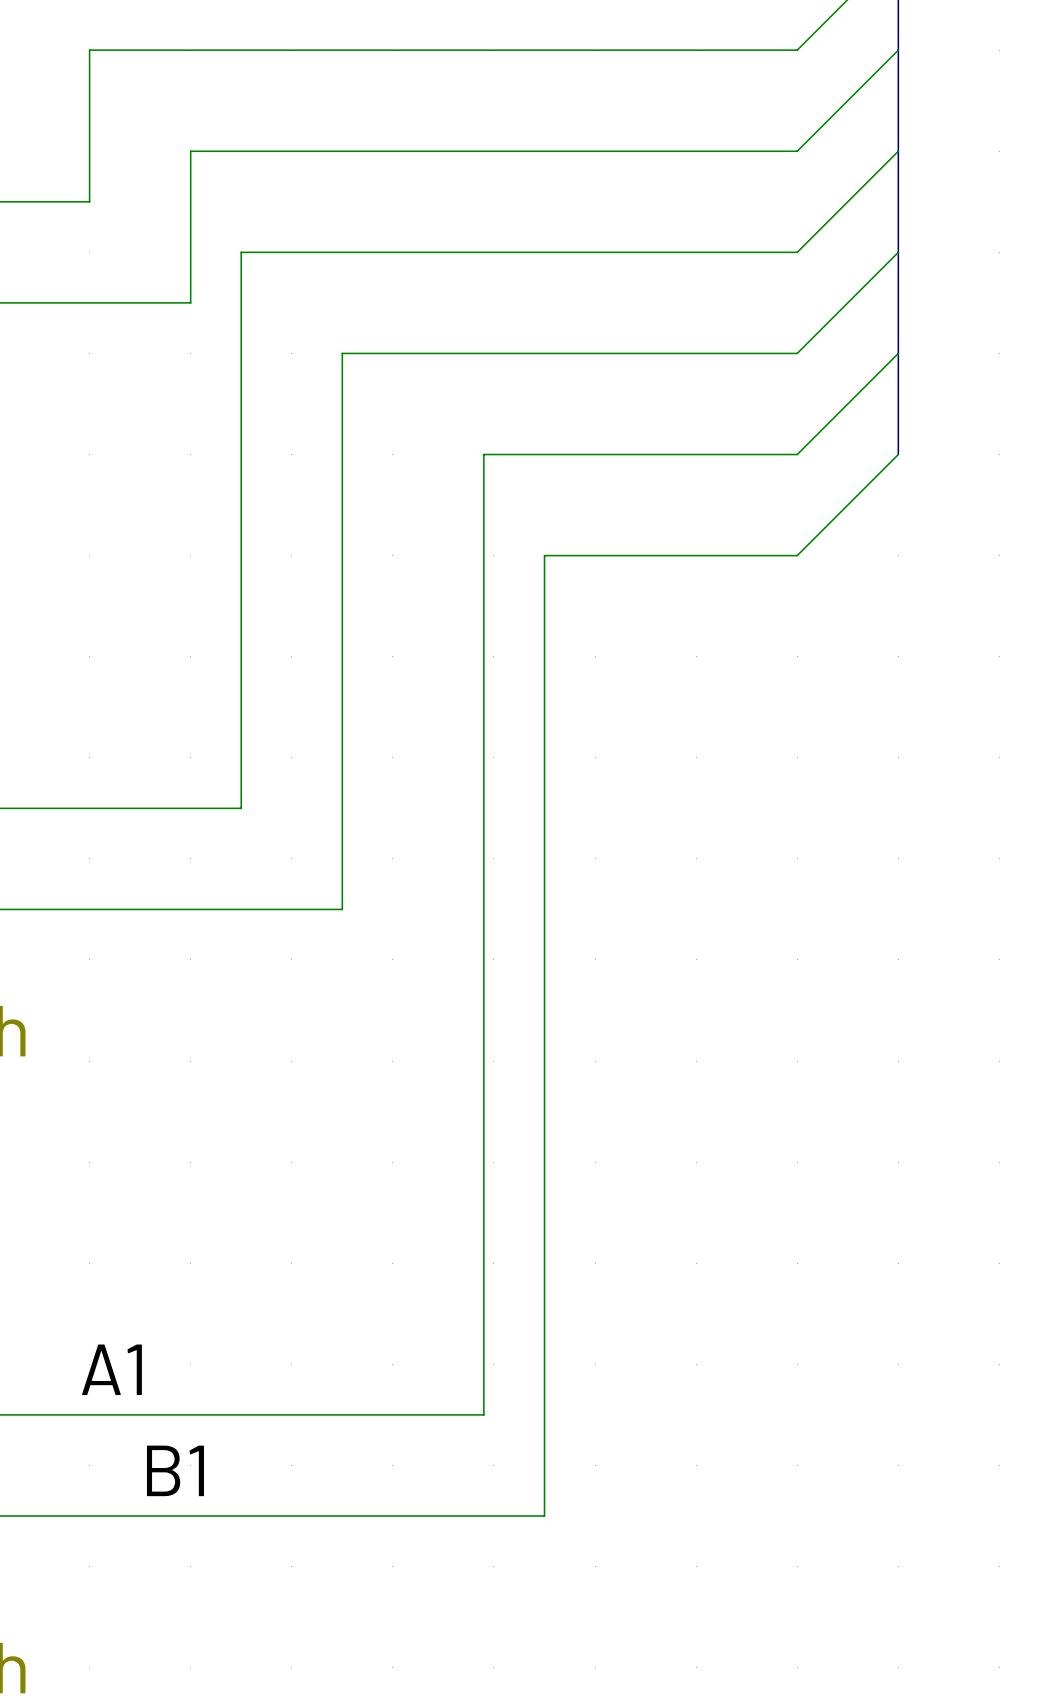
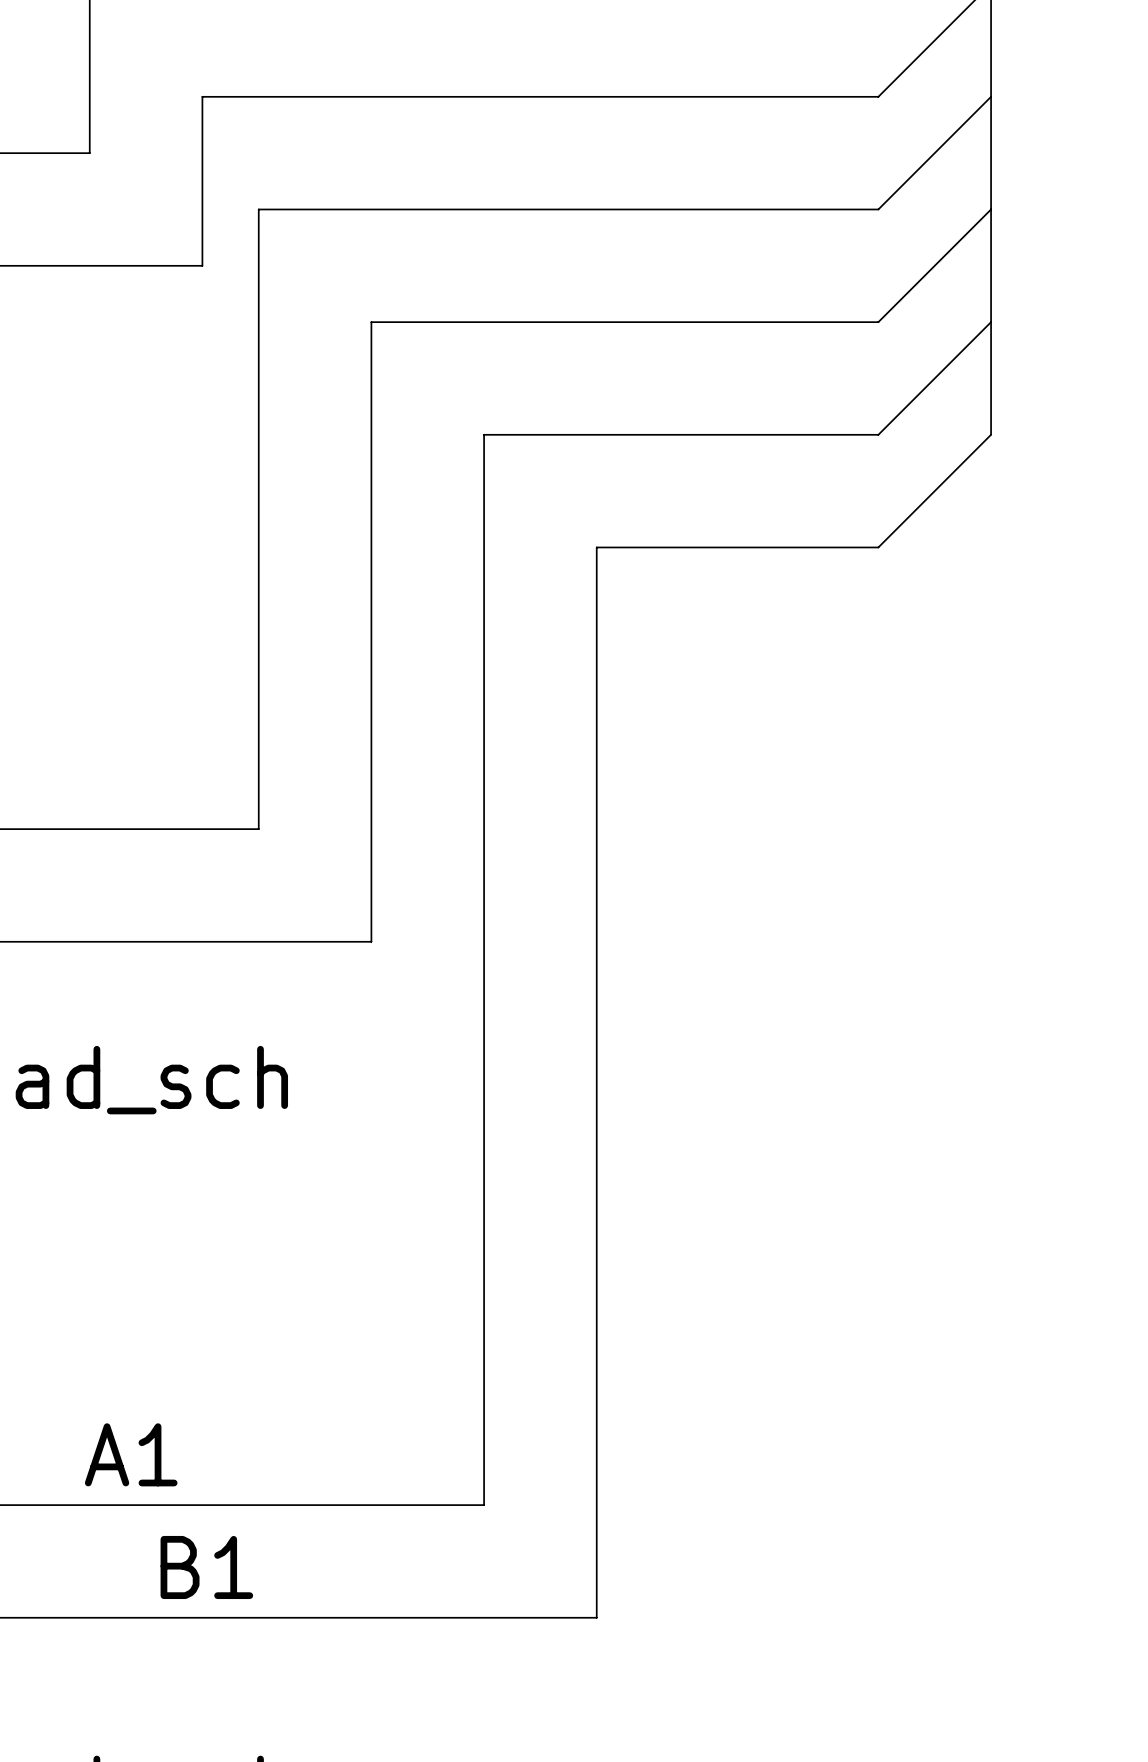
wire: (483, 454) (483, 1414) (443, 1414) -> (529, 434) (484, 434) (484, 1505)

